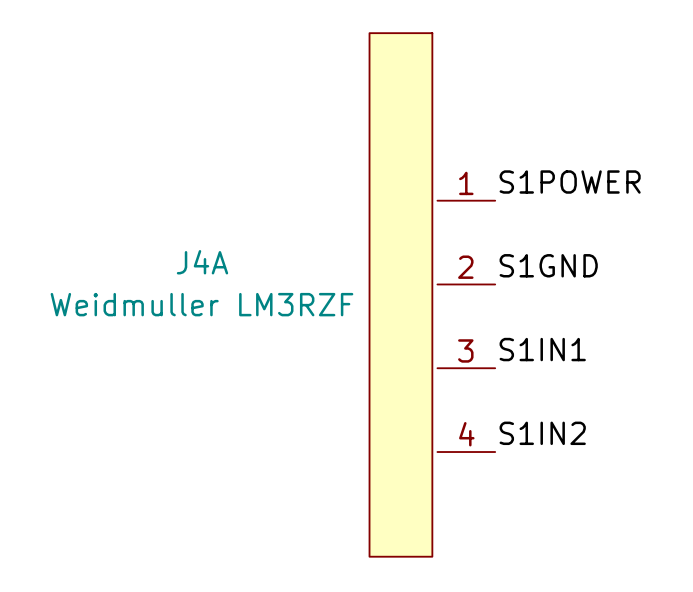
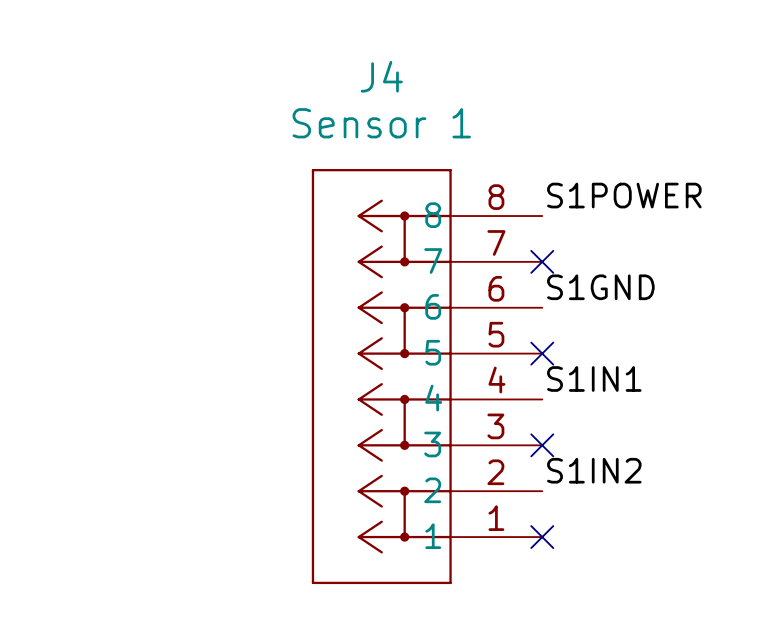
no-connect mark: none -> (542, 261)
J4A: Weidmuller LM3RZF (432, 294) -> none
no-connect mark: none -> (542, 353)
J4: none -> Sensor 1 (427, 376)
no-connect mark: none -> (542, 445)
no-connect mark: none -> (542, 537)

